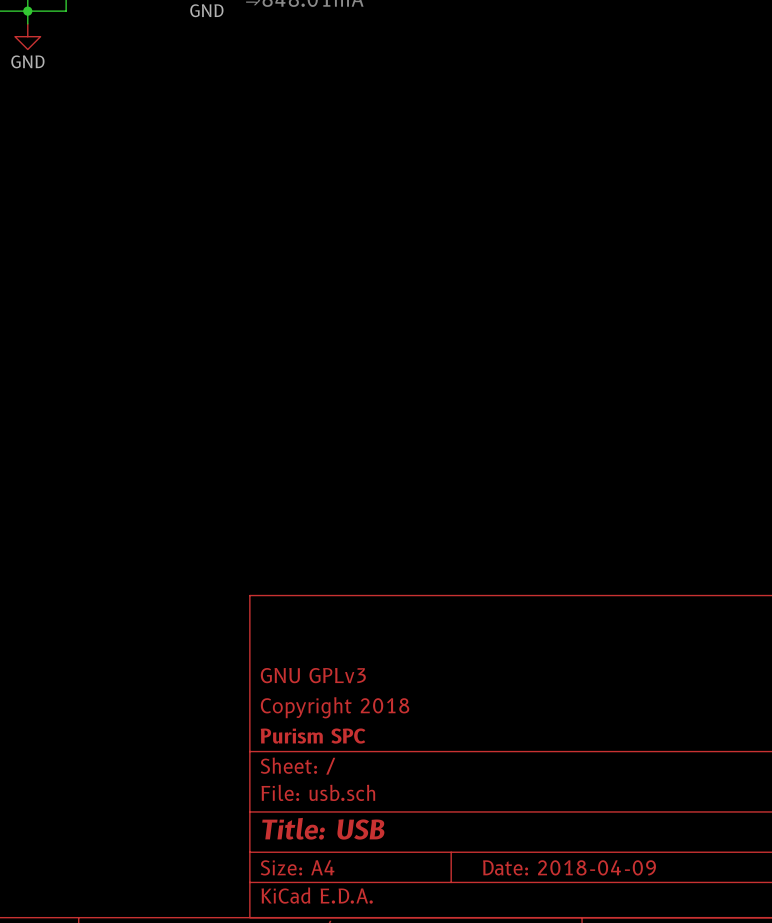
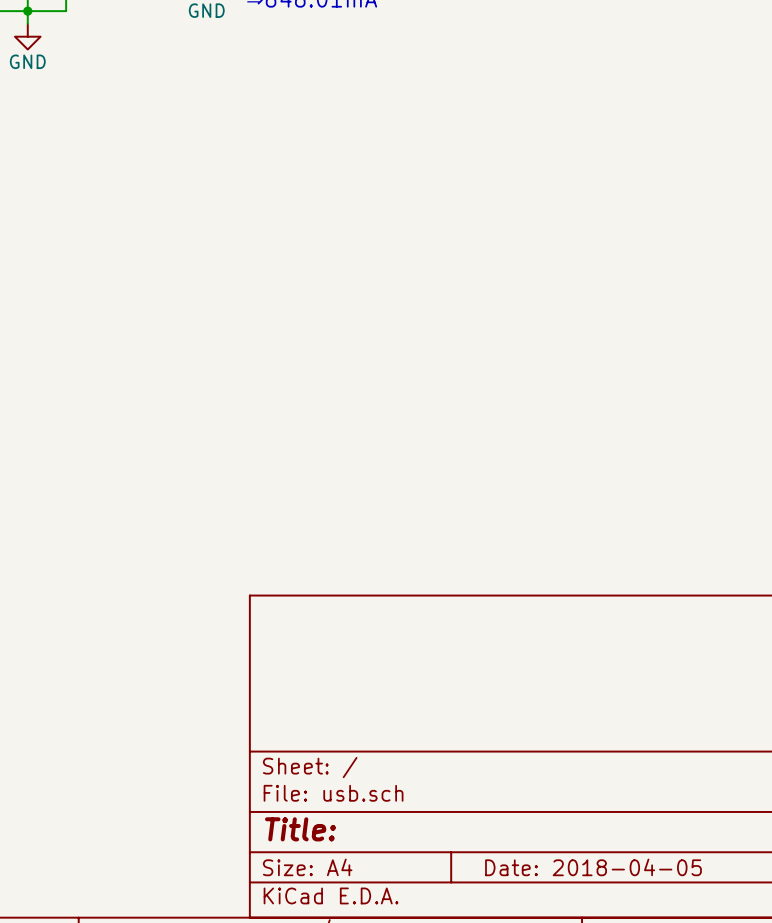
title block: GNU GPLv3 (313, 675) -> none
title block: Copyright 2018 (335, 707) -> none
title block: Purism SPC (313, 736) -> none
title block: Title: USB (323, 828) -> Title: (300, 829)
title block: Date: 2018-04-09 (569, 867) -> Date: 2018-04-05 (593, 867)

